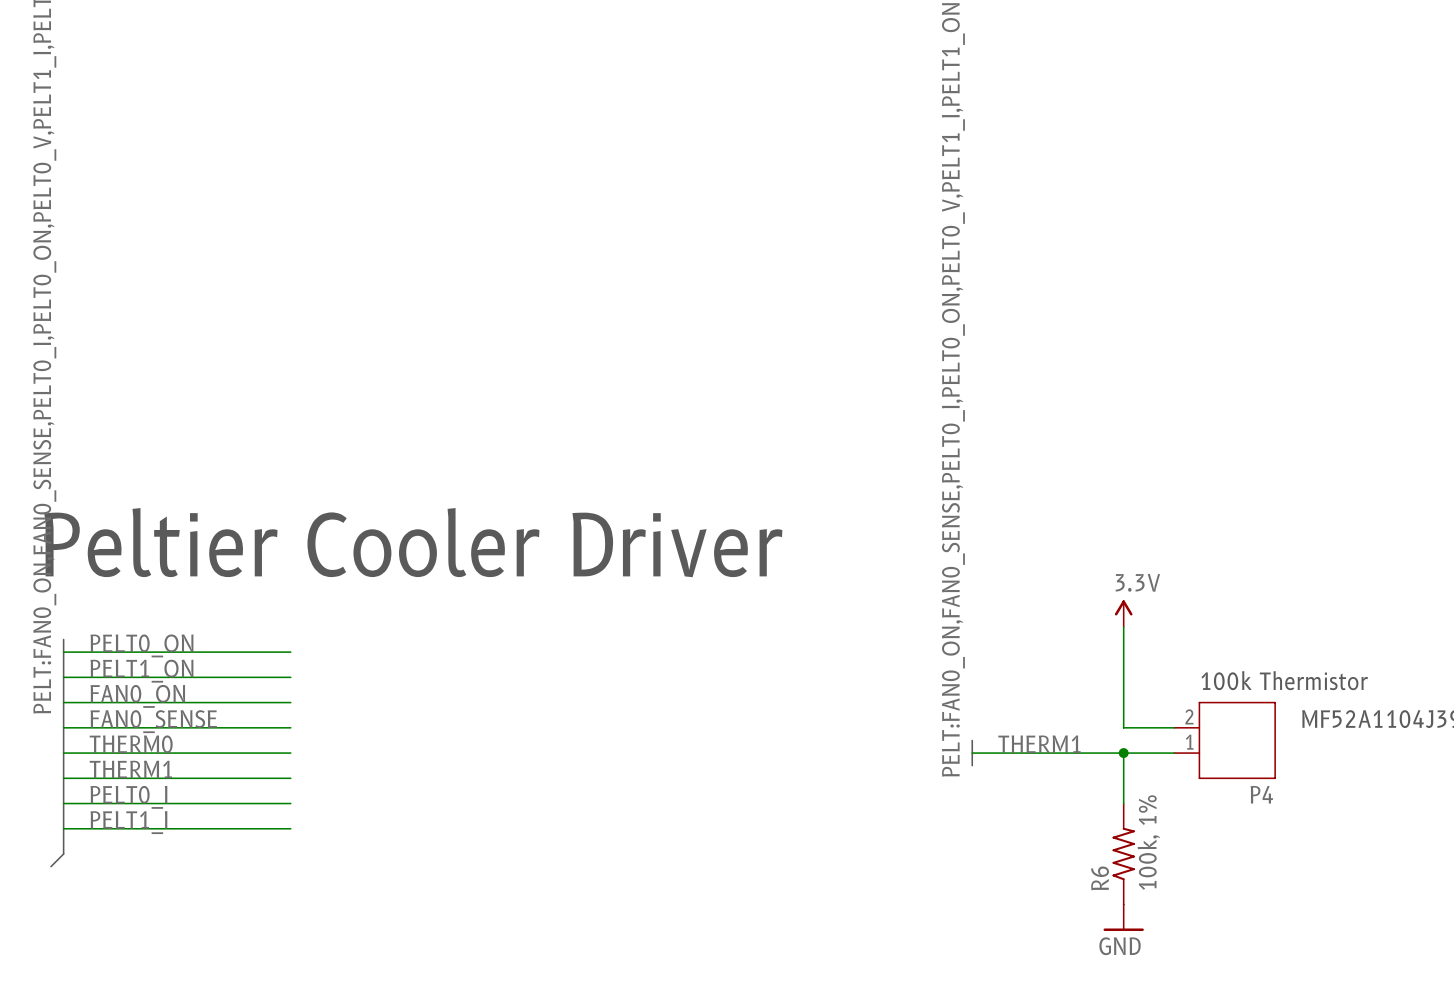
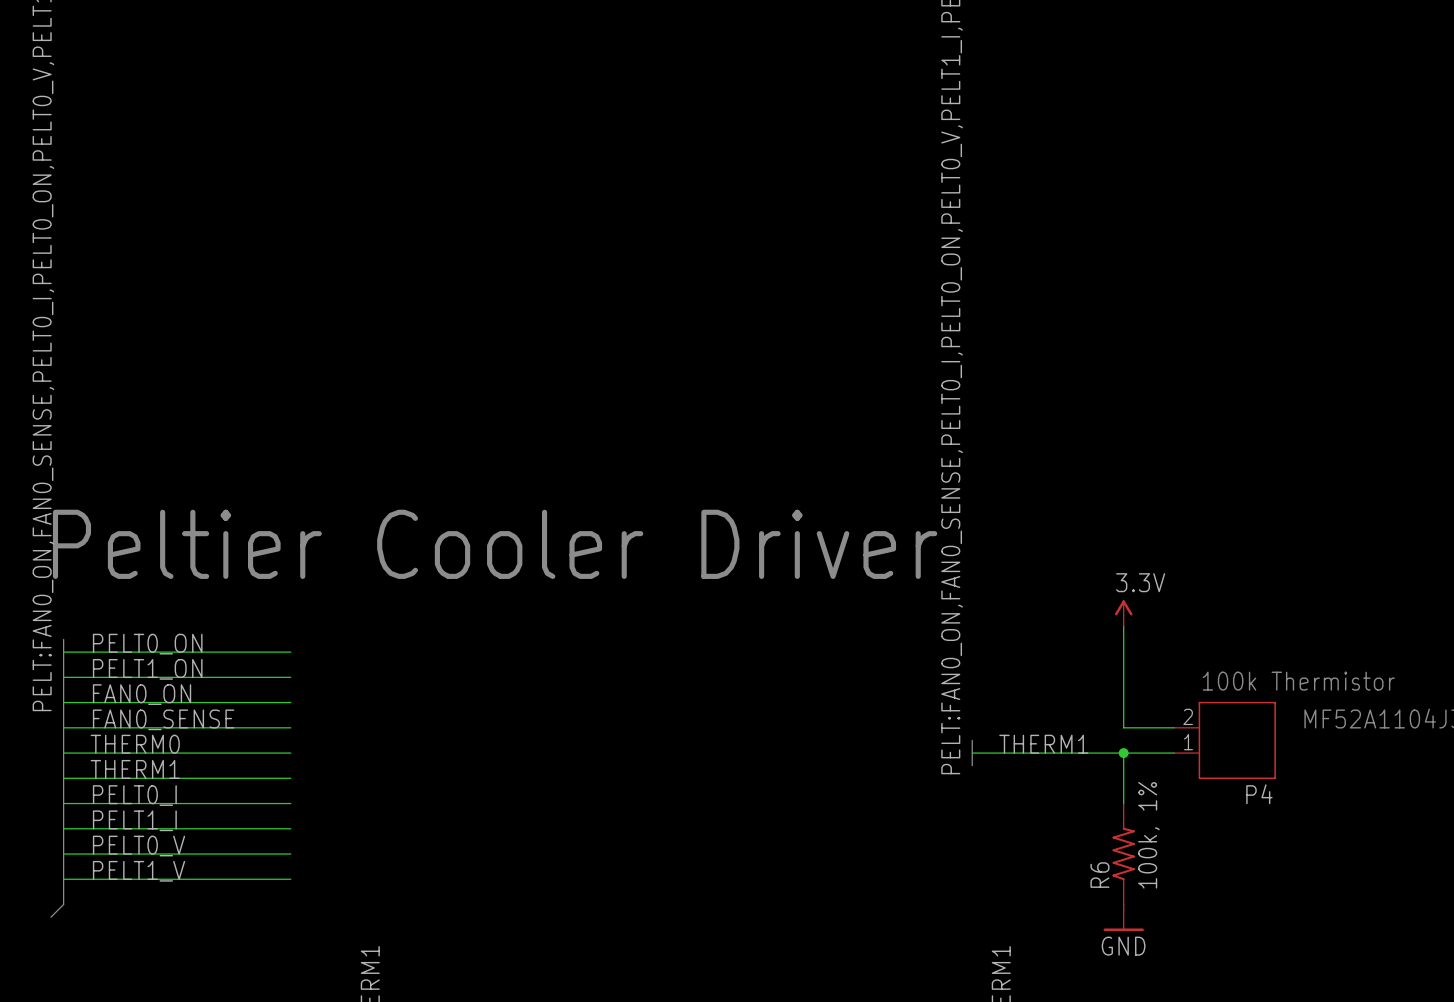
label: none -> PELT0_V (139, 846)
bus: (63, 854) (50, 866) -> (63, 854) (63, 904) (50, 917)
wire: none -> (63, 854) (290, 854)
label: none -> PELT1_V (139, 871)
wire: none -> (63, 879) (290, 879)

